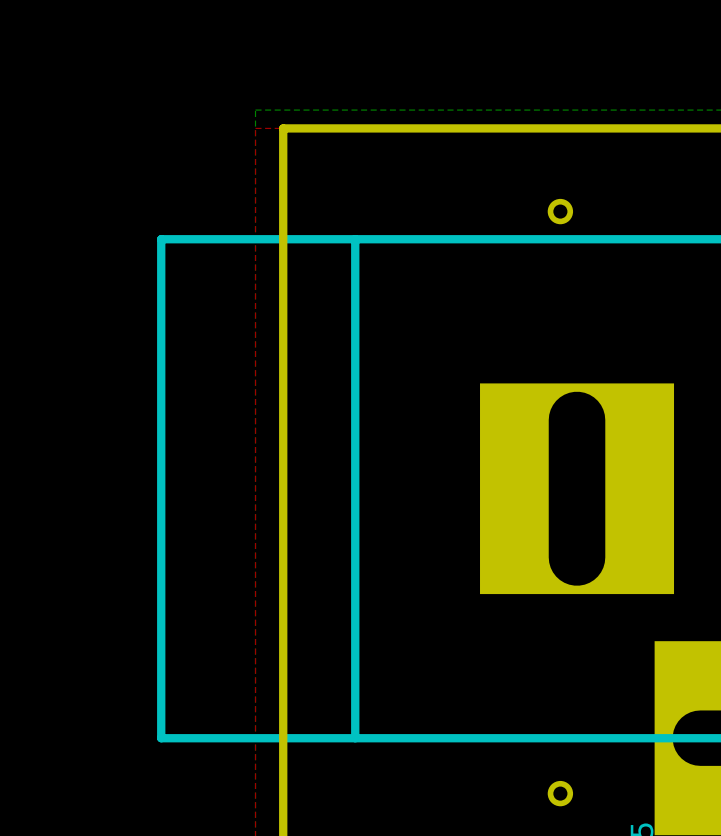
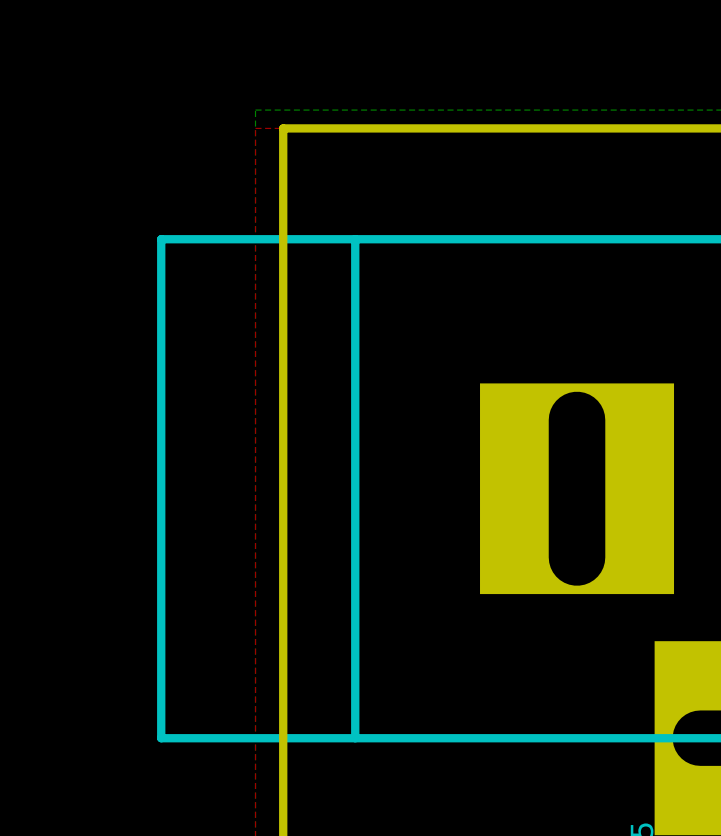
part: (560, 211) -> none
part: (560, 793) -> none

